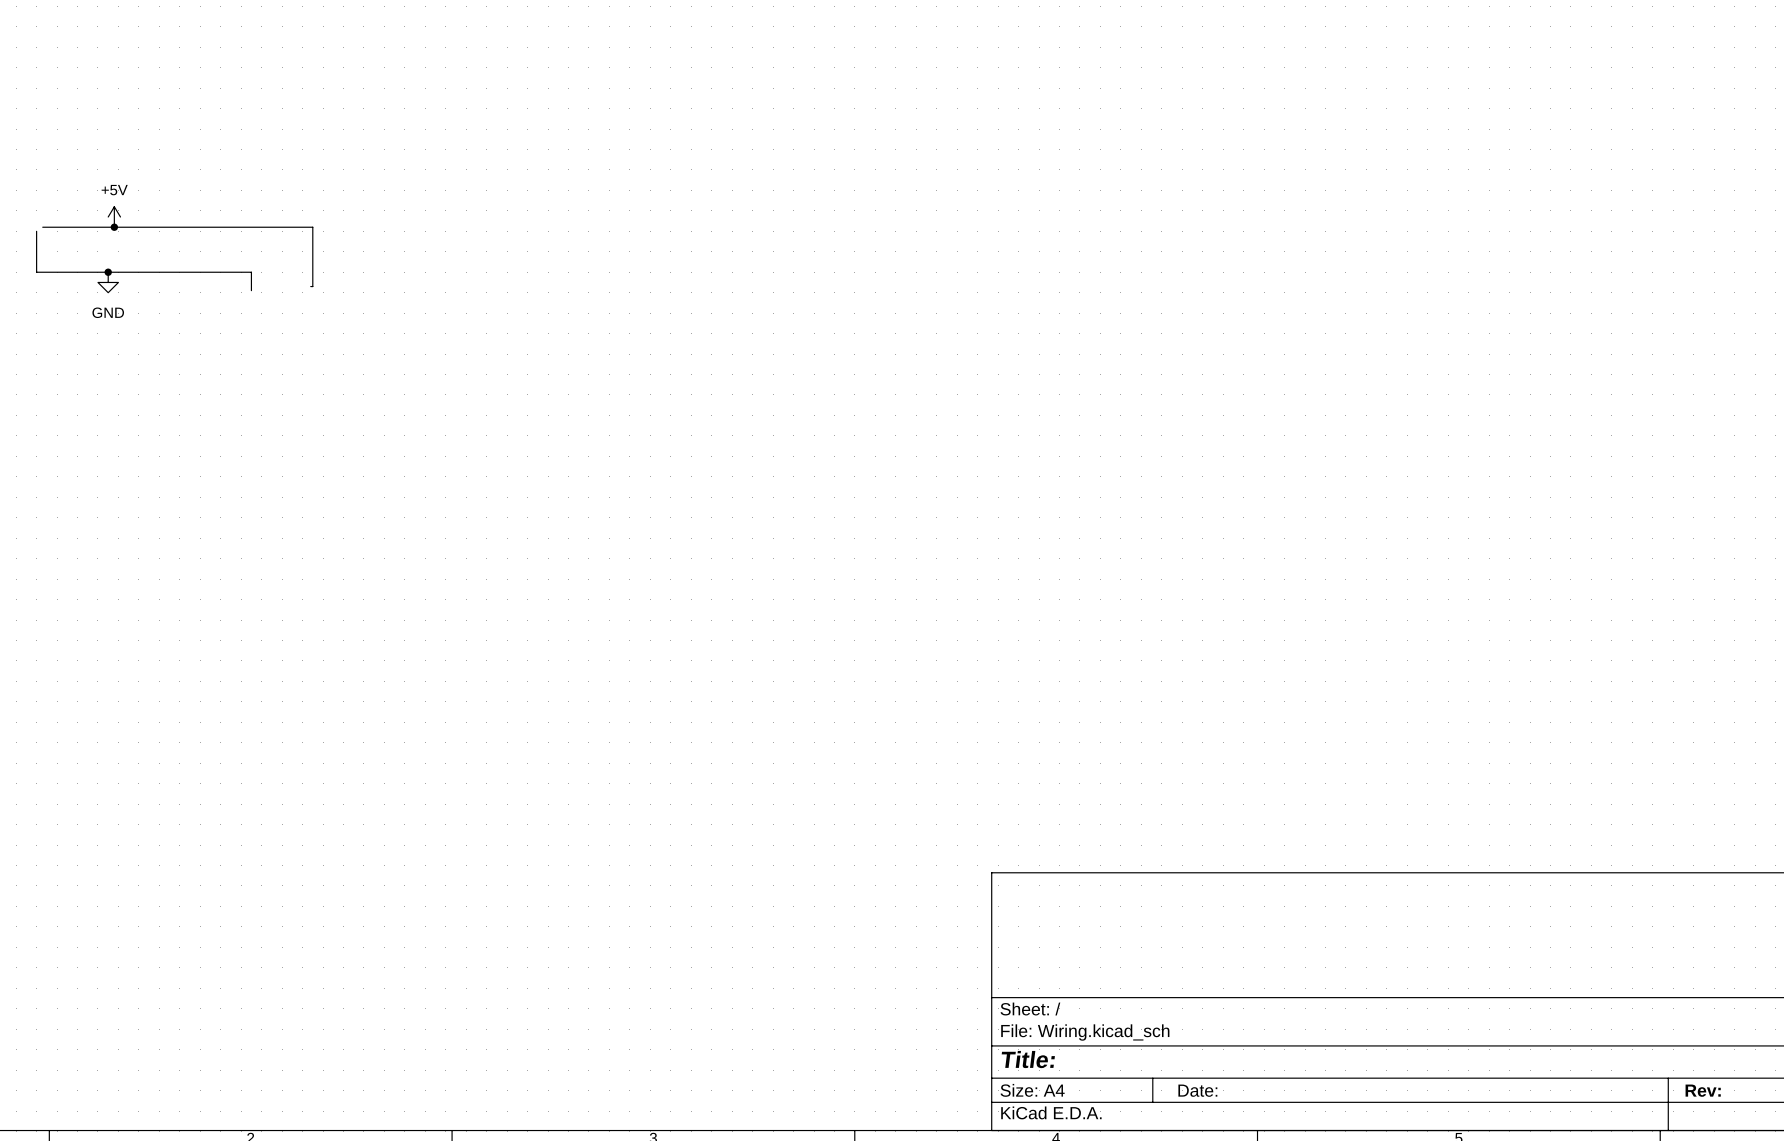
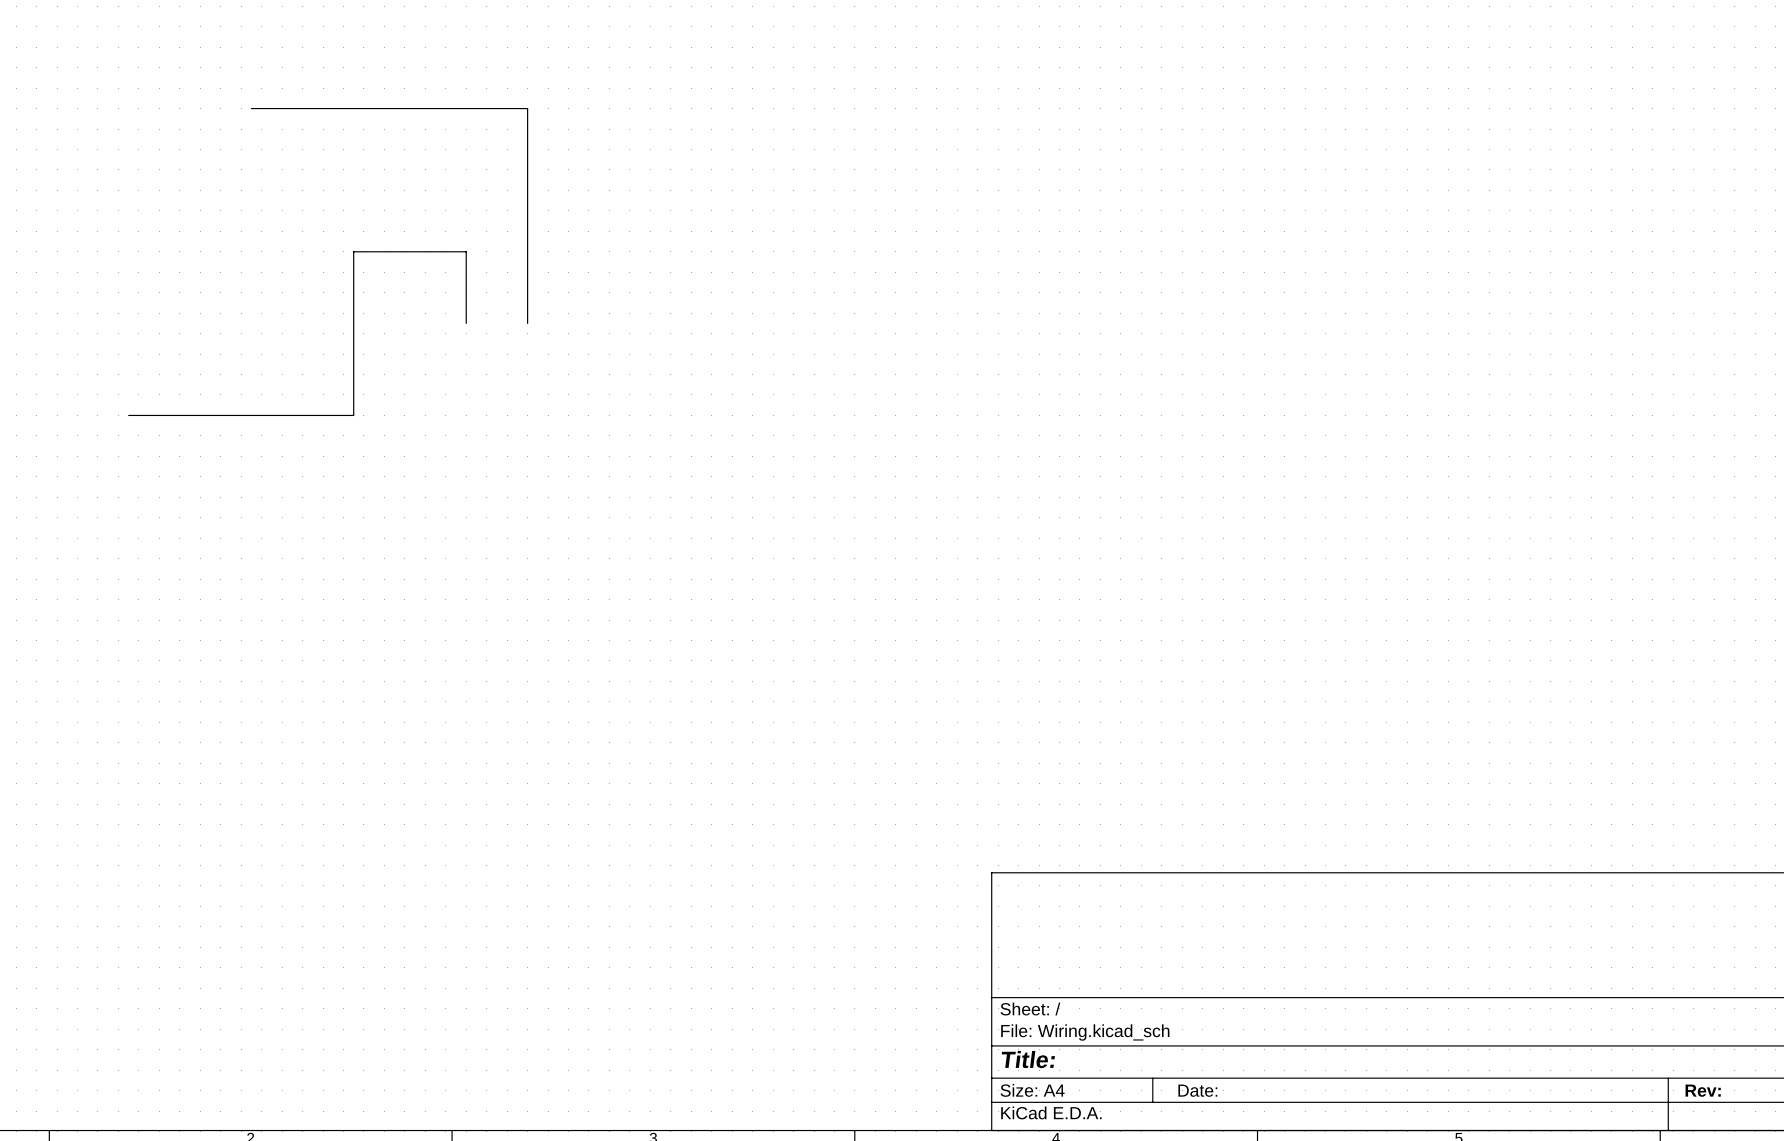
wire: none -> (251, 108) (527, 108) (527, 323)
power symbol: +5V (114, 217) -> none
wire: (42, 227) (312, 227) (312, 286) (310, 286) -> none
junction: (114, 227) -> none
wire: (36, 231) (36, 272) (251, 272) (251, 290) -> none
junction: (108, 272) -> none
power symbol: GND (108, 282) -> none
wire: none -> (466, 323) (466, 251) (353, 251) (353, 415) (128, 415)

